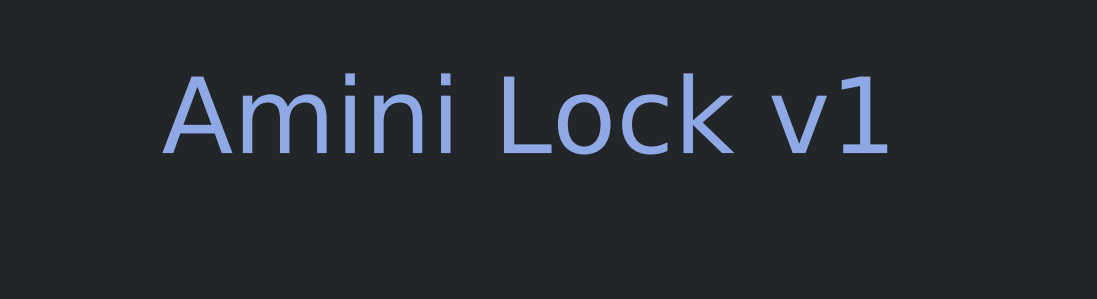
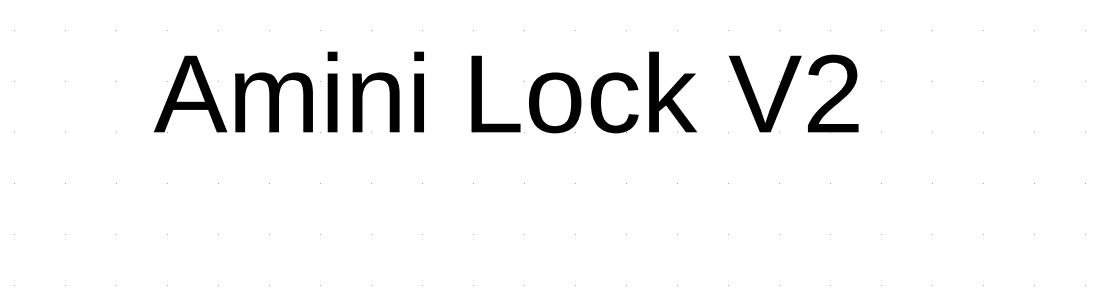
text: Amini Lock v1 (524, 113) -> Amini Lock V2 (506, 92)

